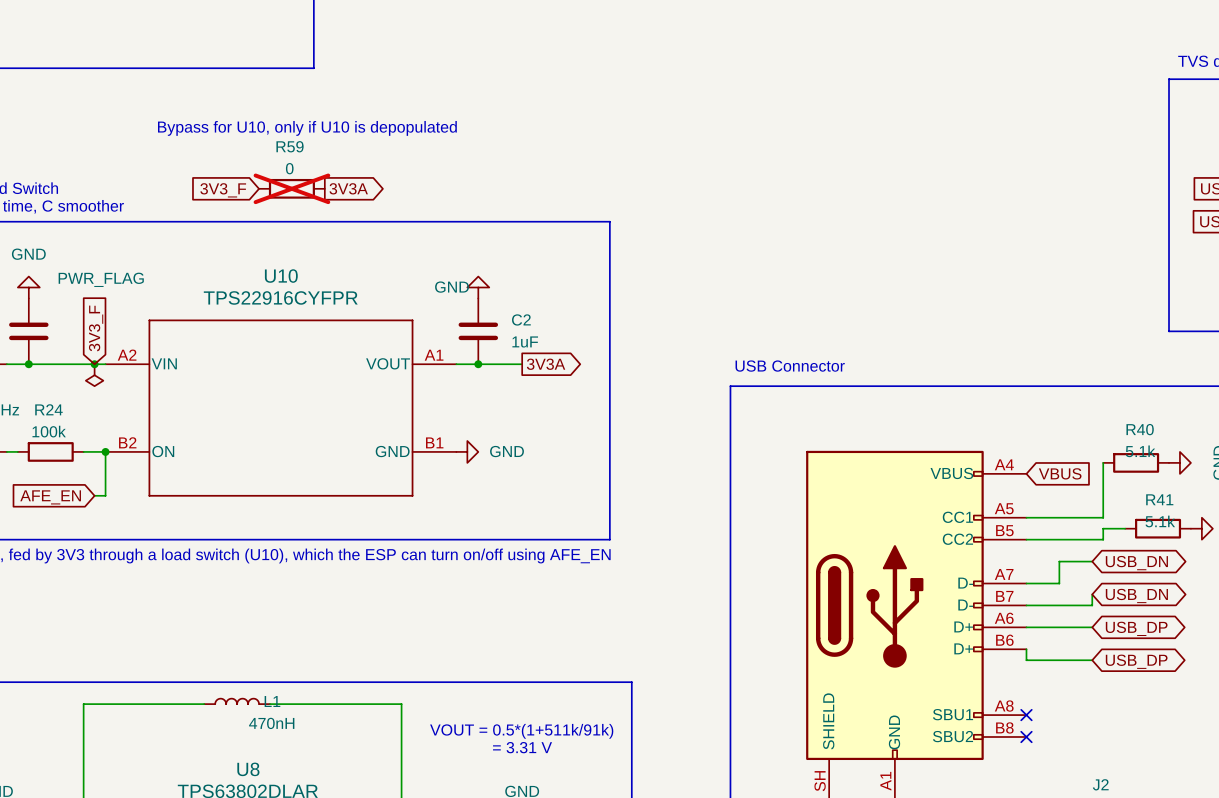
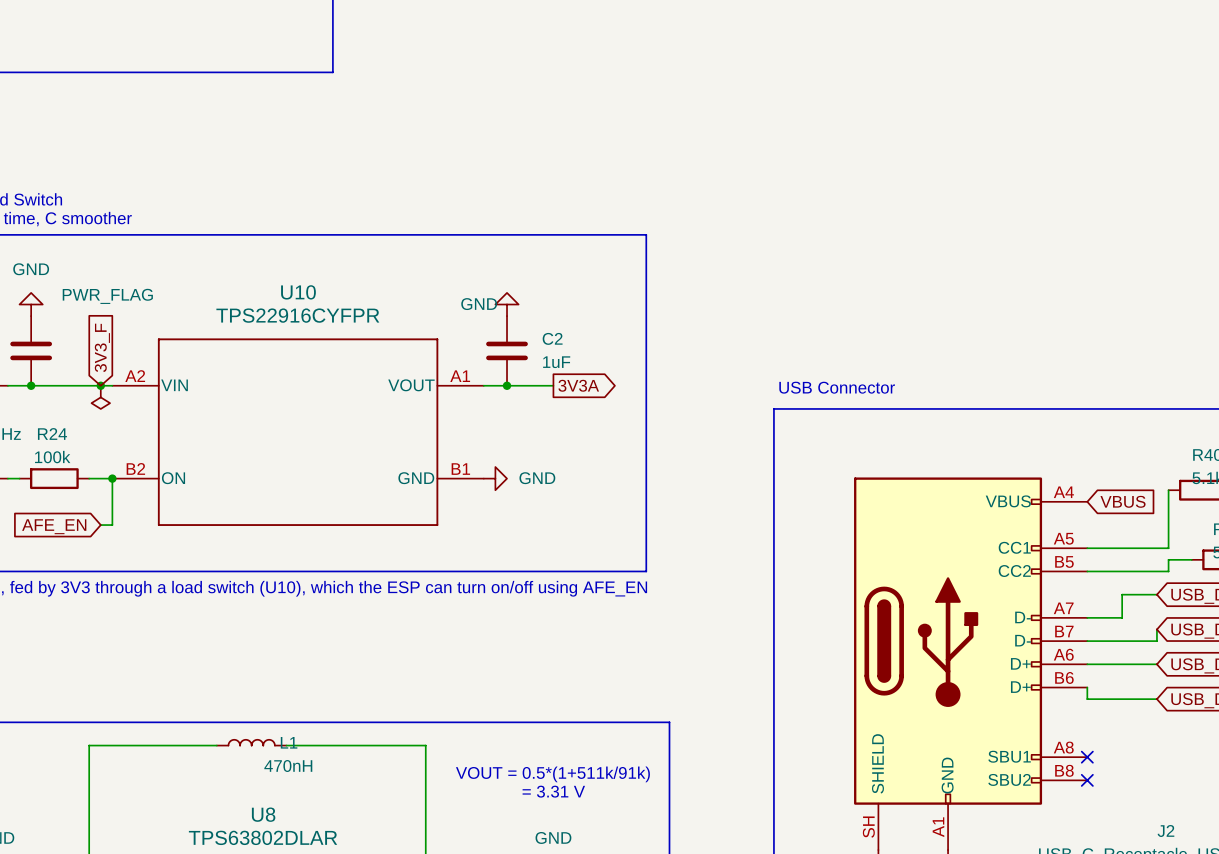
text: Bypass for U10, only if U10 is depopulated (307, 128) -> none
R59: 0 (291, 188) -> none
global label: 3V3A (348, 188) -> none
global label: 3V3_F (223, 190) -> none

